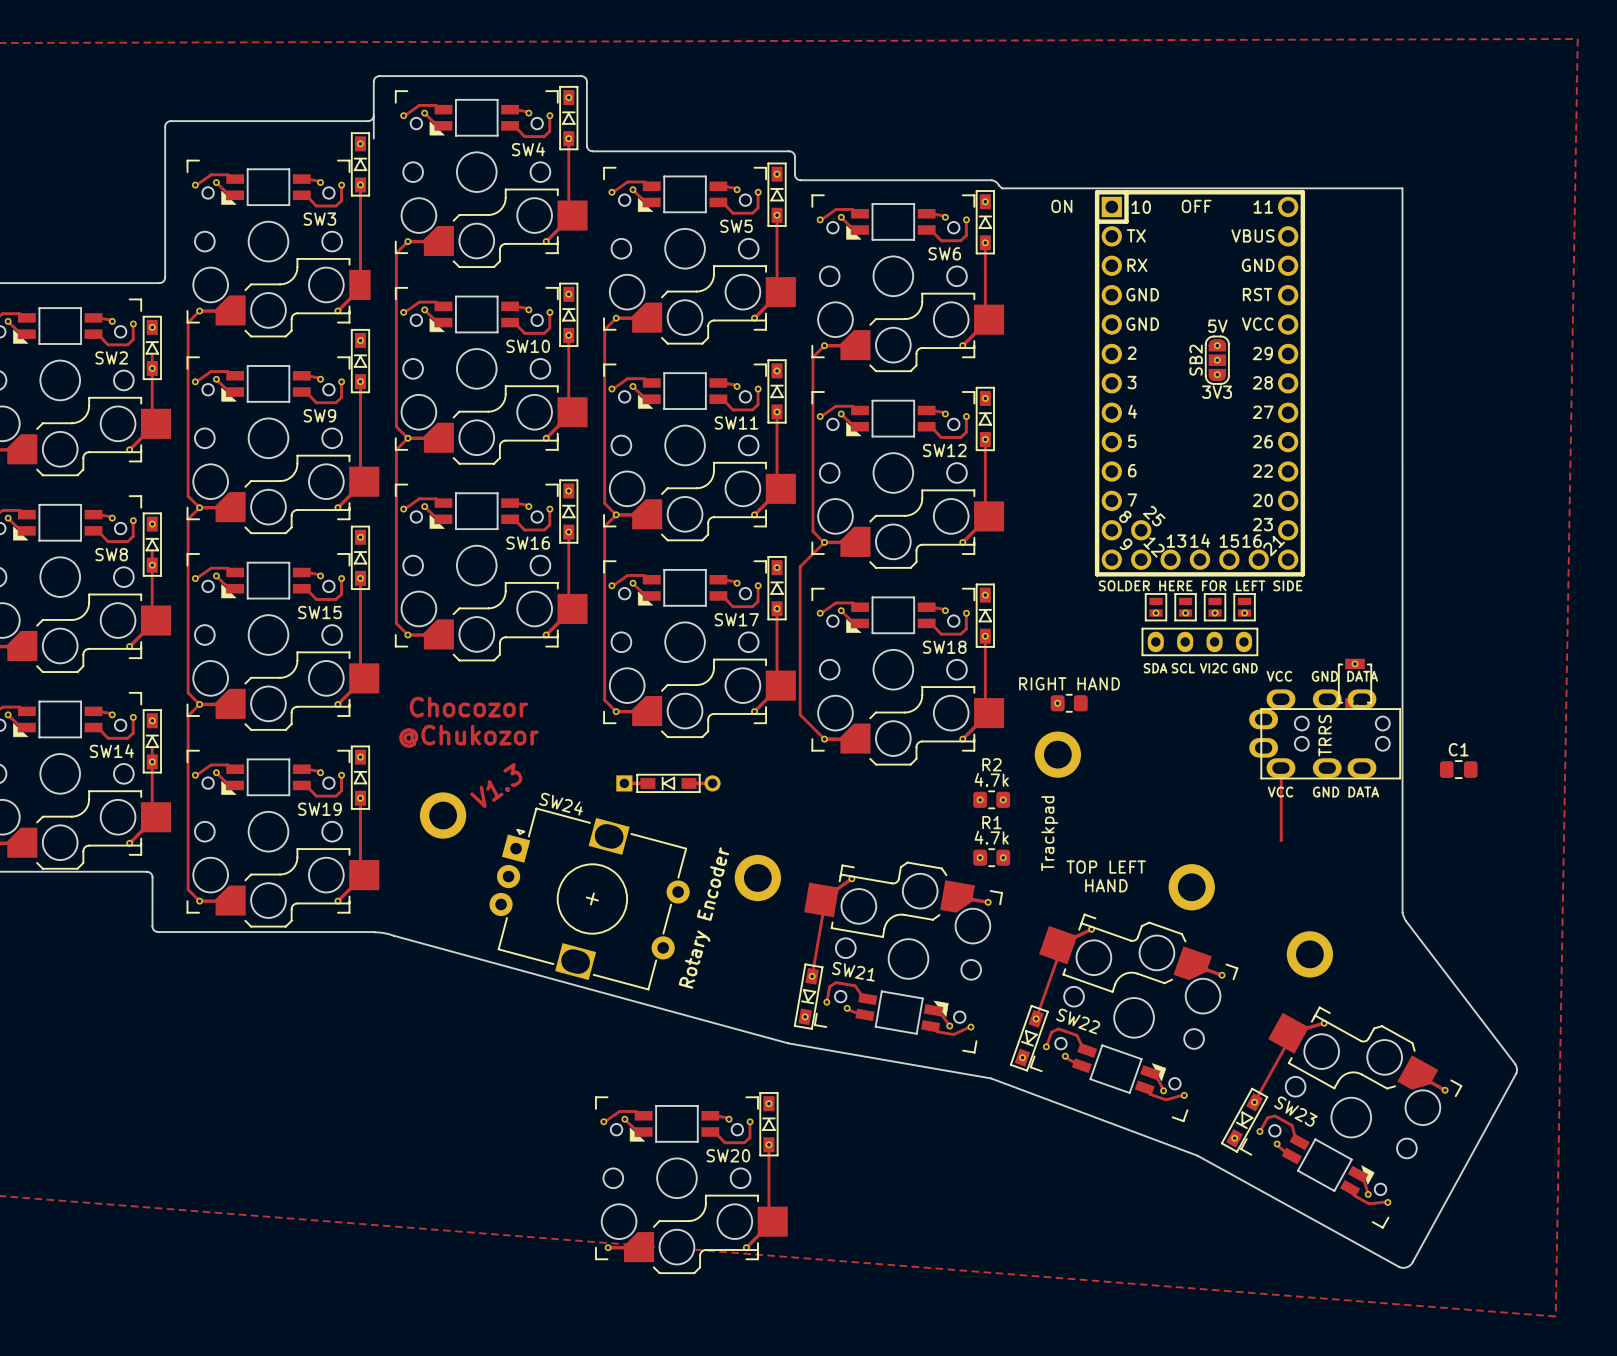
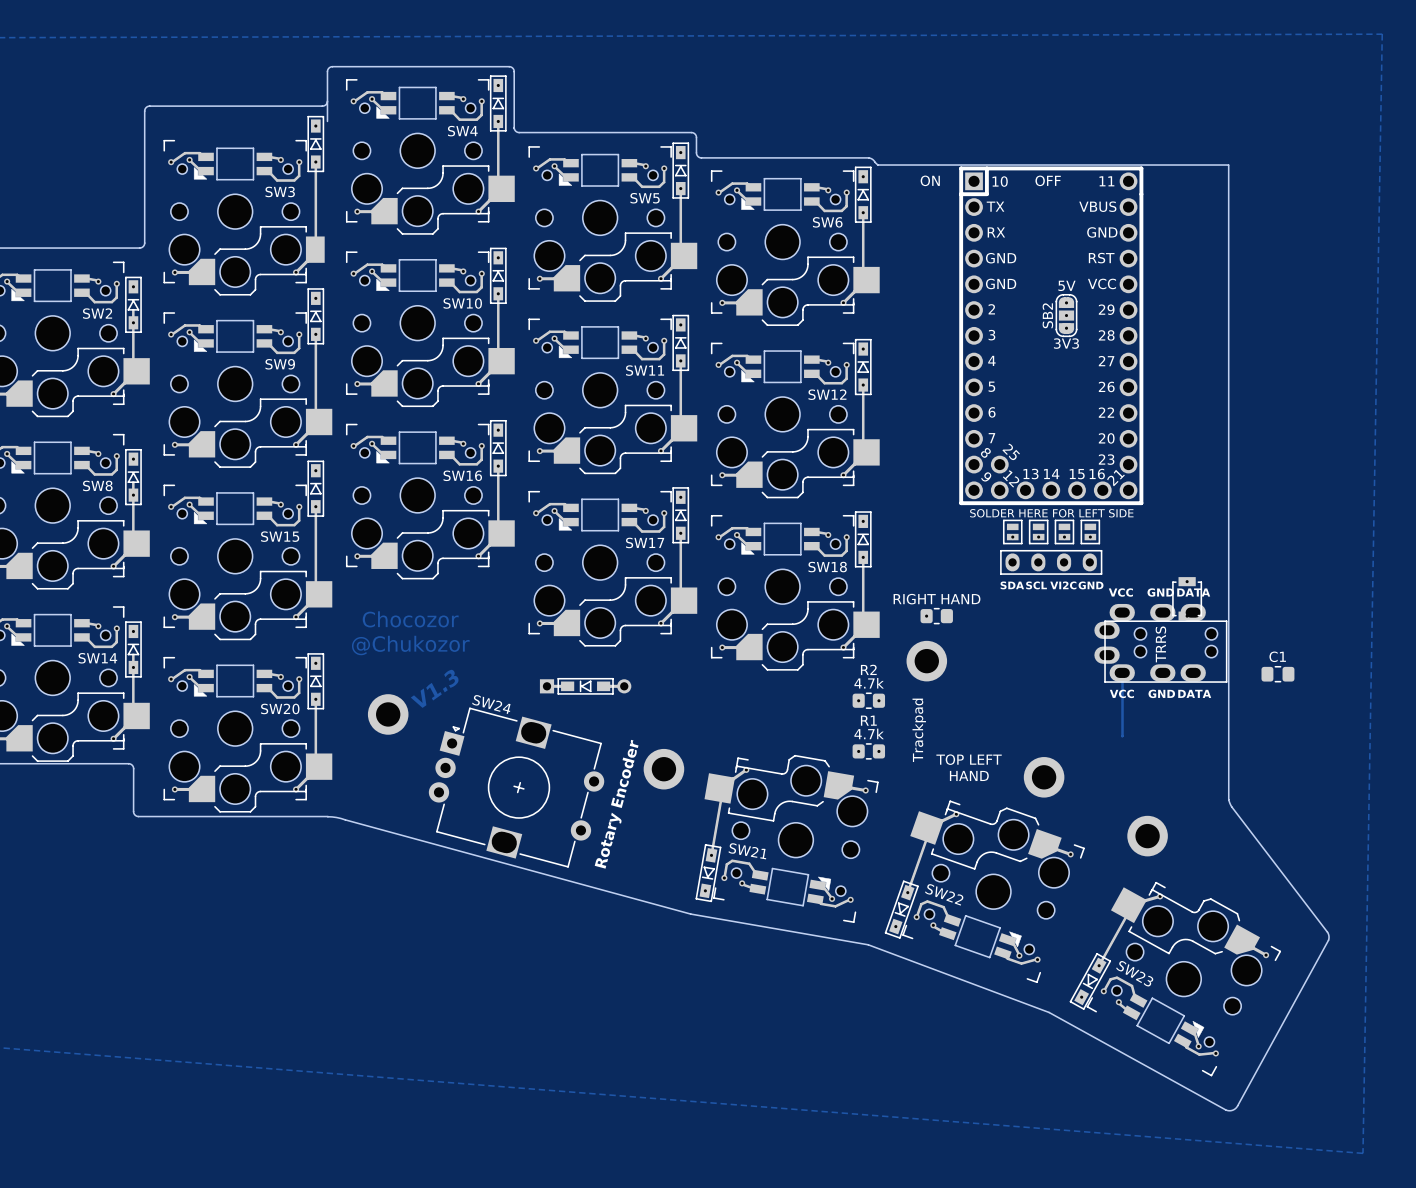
track: (407, 241) (396, 253) (396, 426) (407, 438) (396, 449) (396, 623) (407, 635) -> none
track: (199, 311) (188, 322) (188, 496) (199, 507) (188, 519) (188, 692) (199, 704) (188, 715) (188, 889) (199, 901) -> none
track: (616, 318) (604, 329) (604, 503) (616, 514) (604, 526) (604, 700) (616, 711) -> none
track: (824, 345) (812, 357) (812, 531) (824, 543) -> none
track: (824, 542) (800, 566) (800, 714) (824, 739) (834, 739) -> none
SW19 name: SW19 (319, 809) -> SW20 (280, 708)
SW20: (691, 1183) -> none

